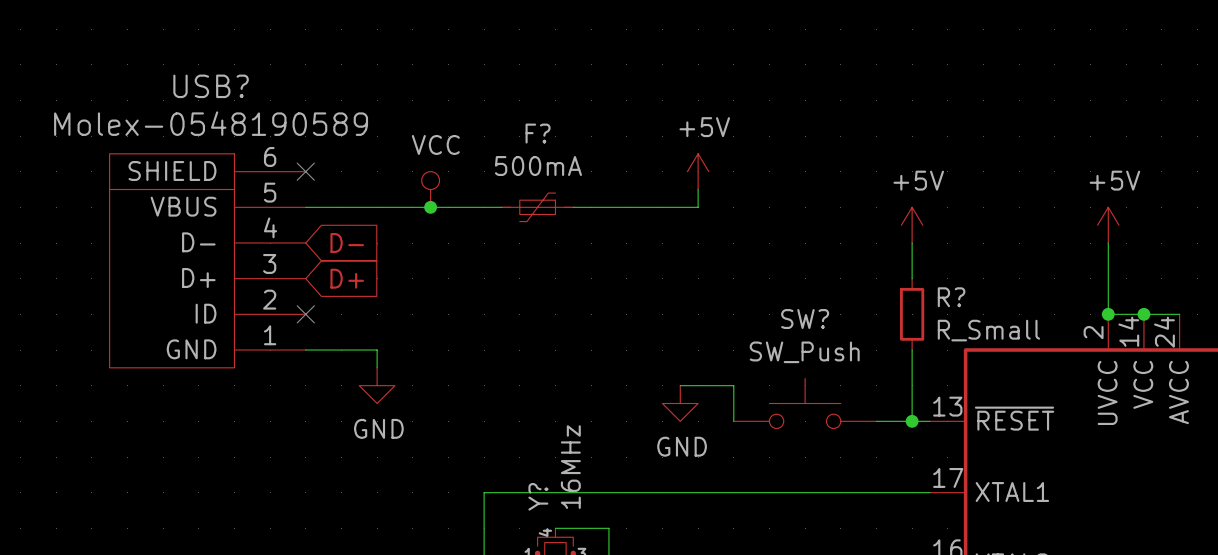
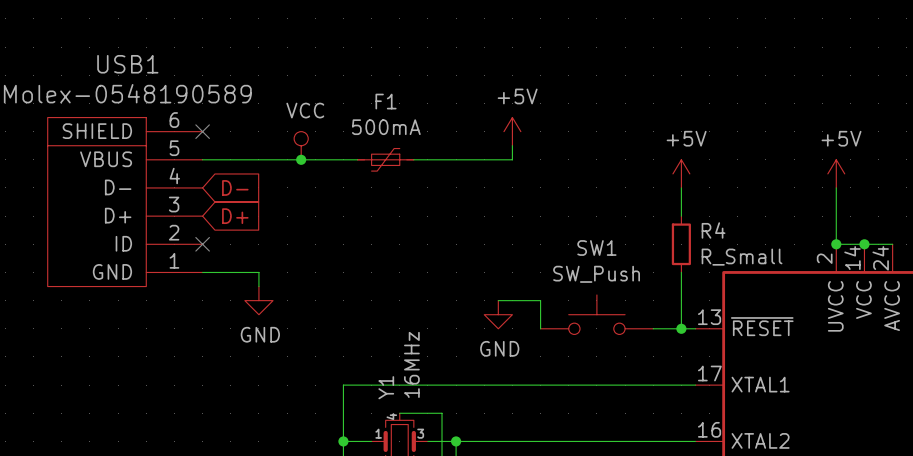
USB? name: USB? (211, 86) -> USB1 (127, 64)
F? name: F? (538, 133) -> F1 (386, 101)
R? name: R? (951, 297) -> R4 (713, 230)
SW? name: SW? (805, 319) -> SW1 (596, 247)
Y? name: Y? (538, 496) -> Y1 (386, 387)

